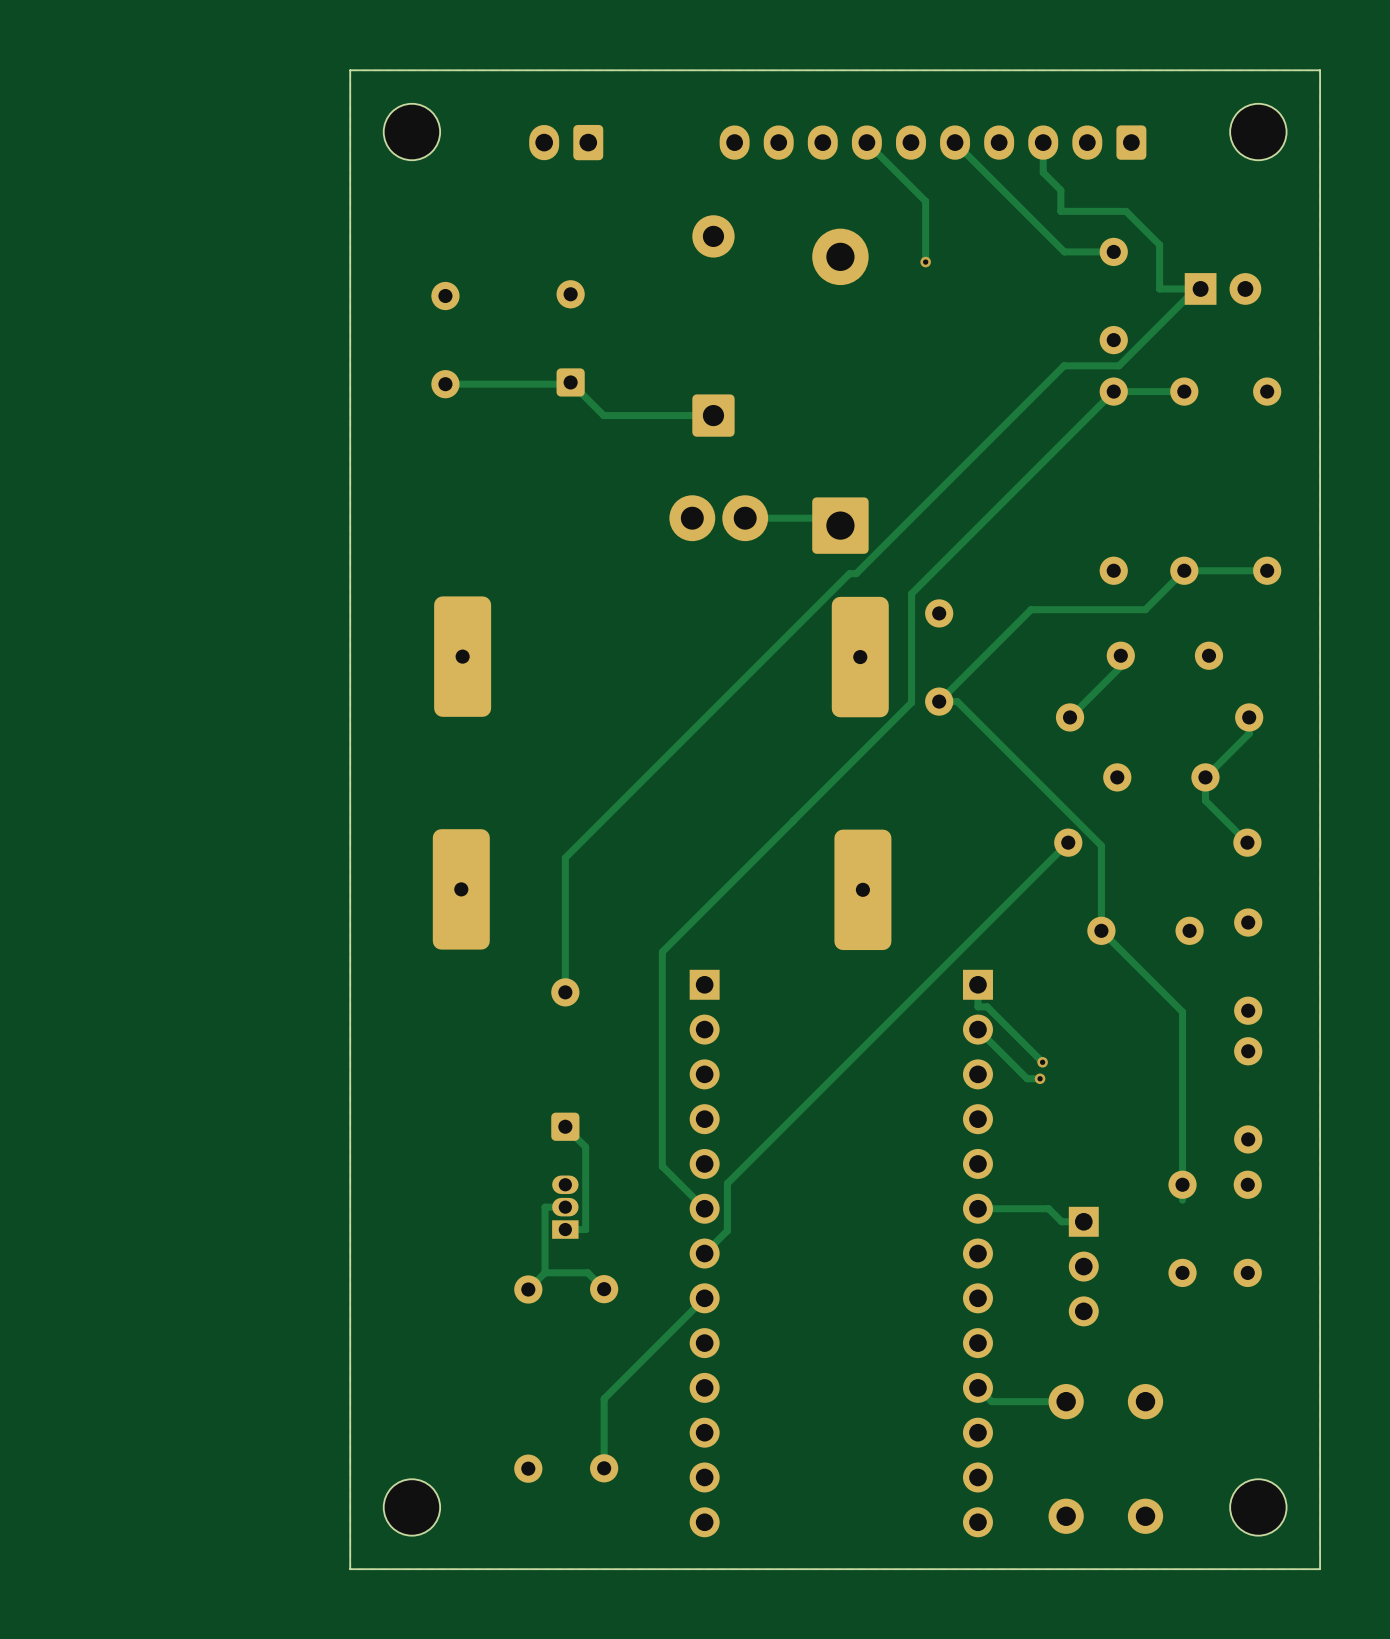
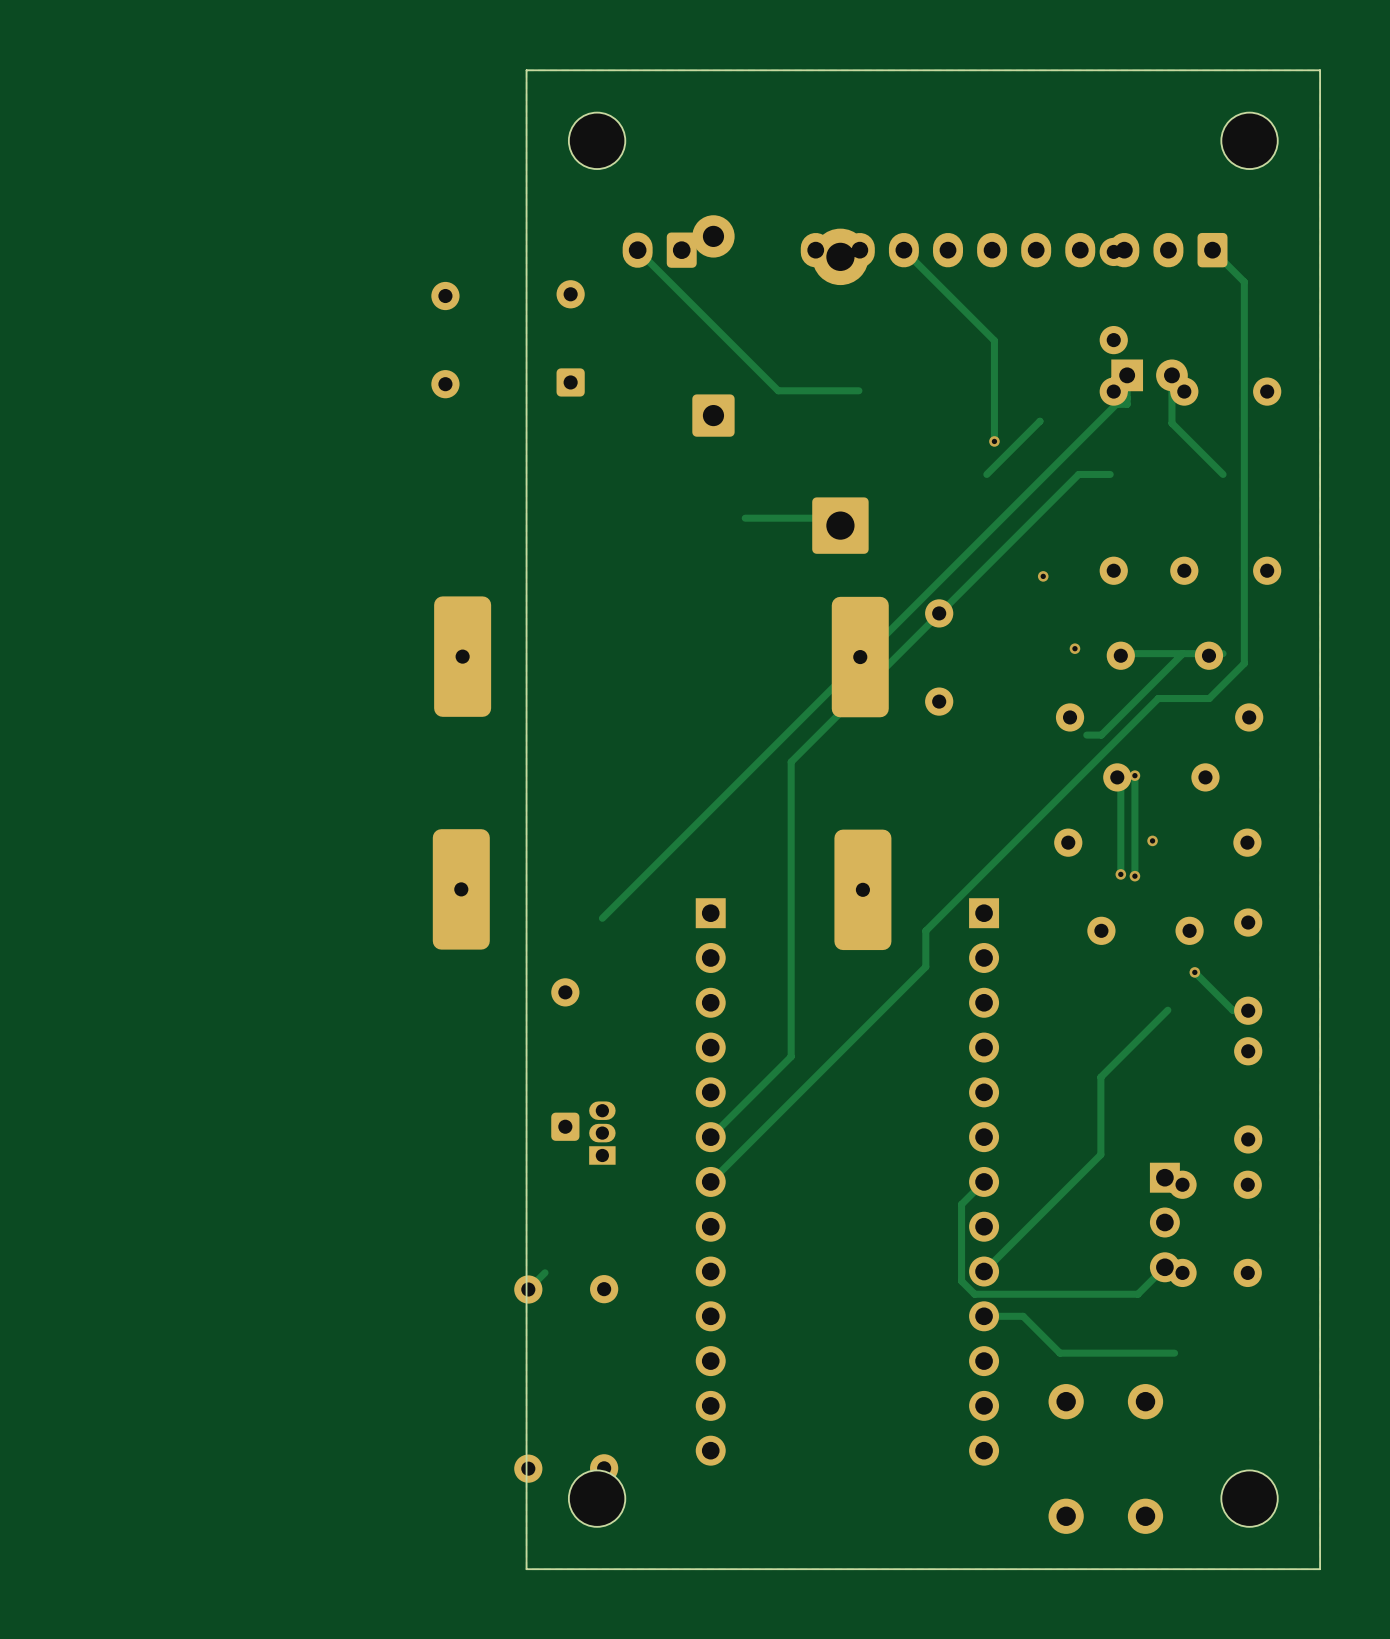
board edge: (526, 70) (350, 70) (350, 1569) (526, 1569) -> (526, 70) (526, 1569)
part position: (411, 132) -> (597, 140)
part position: (1258, 132) -> (1249, 140)
part position: (566, 142) -> (659, 250)
track: (866, 142) (925, 201) (925, 262) -> none
part position: (933, 142) -> (1014, 250)
track: (955, 142) (1064, 251) (1113, 251) -> none
track: (1043, 142) (1043, 172) (1060, 190) (1060, 211) (1126, 211) (1159, 244) (1159, 288) (1200, 288) -> none
track: none -> (637, 250) (778, 390) (858, 390)
track: none -> (903, 250) (994, 340) (994, 441)
track: none -> (1212, 250) (1244, 281) (1244, 663) (1209, 698) (1158, 698) (925, 930) (925, 966) (710, 1181)
via: (925, 262) -> none
track: (1189, 288) (1189, 295) (1119, 365) (1064, 365) (856, 573) (849, 573) (565, 857) (565, 992) -> none
part position: (1223, 288) -> (1149, 375)
track: none -> (1127, 375) (1127, 404) (1116, 404) (602, 918)
track: none -> (1171, 375) (1171, 423) (1223, 474)
track: (445, 384) (568, 384) (570, 382) (603, 415) (713, 415) -> none
track: (1184, 391) (1113, 391) (911, 593) (911, 702) (662, 951) (662, 1166) (704, 1208) -> none
track: none -> (1039, 421) (986, 474)
via: none -> (994, 441)
track: none -> (1110, 474) (1078, 474) (791, 761) (791, 1056) (710, 1137)
part: (718, 518) -> none
track: (1267, 570) (1184, 570) (1145, 609) (1031, 609) (939, 701) (957, 701) (1101, 845) (1101, 930) (1182, 1011) (1182, 1200) -> none
via: none -> (1043, 576)
via: none -> (1074, 648)
track: none -> (1182, 653) (1101, 735) (1086, 735)
track: none -> (1223, 653) (1110, 653)
track: (1120, 655) (1120, 666) (1070, 717) -> none
track: (1249, 717) (1249, 733) (1205, 777) (1205, 800) (1247, 842) -> none
track: none -> (1120, 775) (1120, 874)
track: none -> (1134, 775) (1134, 876)
via: none -> (1134, 775)
via: none -> (1152, 840)
track: (1068, 842) (727, 1183) (727, 1230) (704, 1253) -> none
via: none -> (1120, 874)
via: none -> (1134, 876)
track: none -> (1194, 972) (1233, 1010)
via: none -> (1194, 972)
track: (977, 984) (977, 1006) (987, 1006) (1042, 1062) -> none
track: none -> (1167, 1010) (1100, 1077) (1100, 1154) (984, 1271)
track: (977, 1029) (1027, 1078) (1040, 1078) -> none
via: (1042, 1062) -> none
via: (1040, 1078) -> none
track: (565, 1126) (585, 1147) (585, 1229) (565, 1229) -> none
track: none -> (984, 1181) (961, 1204) (961, 1281) (974, 1294) (1137, 1294) (1164, 1267)
track: (565, 1207) (545, 1207) (545, 1272) (587, 1272) (604, 1289) -> none
part position: (565, 1207) -> (602, 1133)
track: (977, 1208) (1048, 1208) (1061, 1221) (1083, 1221) -> none
part position: (704, 1253) -> (710, 1181)
part position: (977, 1253) -> (984, 1181)
part position: (1083, 1266) -> (1164, 1222)
track: (704, 1298) (604, 1398) (604, 1468) -> none
track: none -> (984, 1316) (1023, 1316) (1059, 1353) (1174, 1353)
track: (977, 1387) (991, 1401) (1066, 1401) -> none
part position: (411, 1507) -> (597, 1498)
part position: (1258, 1507) -> (1249, 1498)

